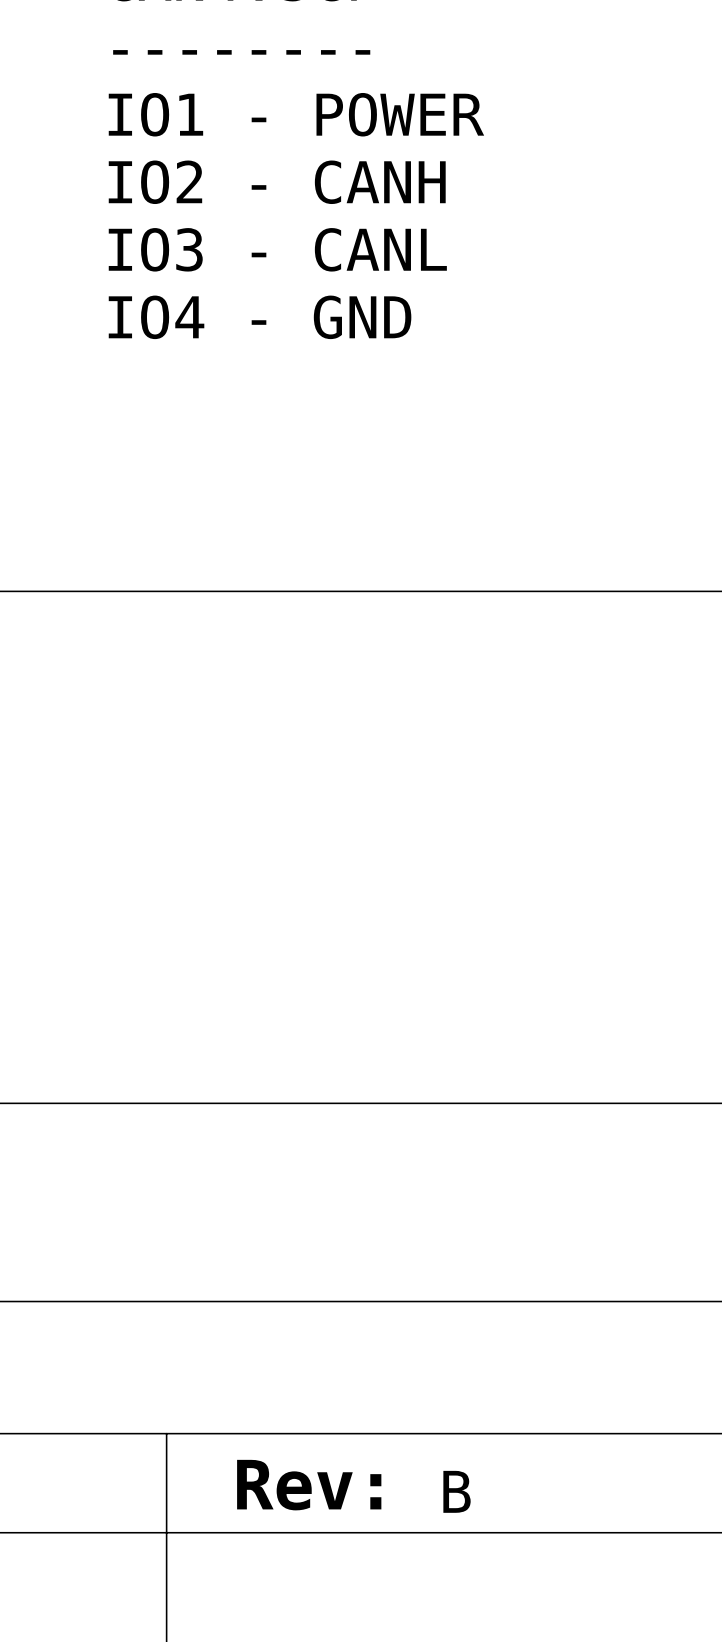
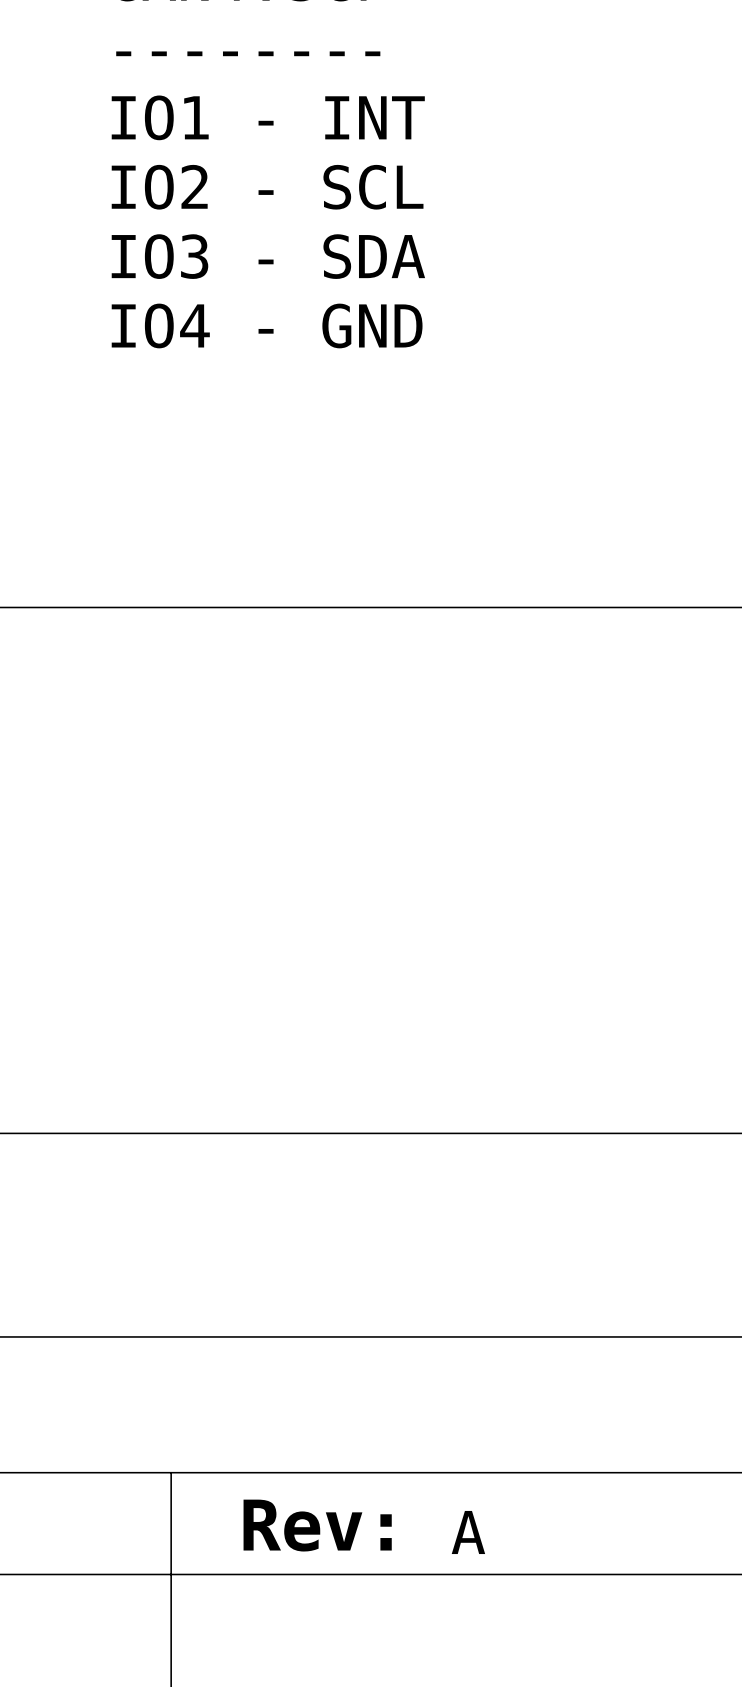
text: IO1 - POWER (296, 114) -> IO1 - INT (268, 117)
text: IO2 - CANH (277, 182) -> IO2 - SCL (267, 187)
text: IO3 - CANL (277, 249) -> IO3 - SDA (268, 256)
text: B (457, 1491) -> A (468, 1532)

